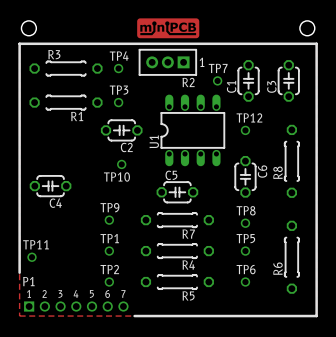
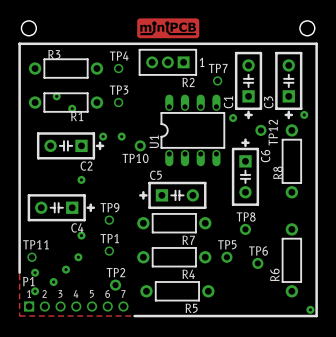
R3 footprint: [29, 60, 103, 77] -> [28, 58, 104, 79]
C1 footprint: [237, 60, 260, 102] -> [234, 51, 263, 120]
C3 footprint: [277, 60, 300, 102] -> [275, 51, 303, 120]
R1 footprint: [29, 94, 103, 111] -> [28, 92, 104, 113]
via: none -> (56, 96)
via: none -> (72, 108)
via: none -> (304, 114)
via: none -> (233, 118)
C2 footprint: [100, 119, 143, 142] -> [36, 132, 105, 160]
R8 footprint: [283, 124, 300, 198] -> [281, 124, 303, 199]
TP12 footprint: [240, 125, 251, 136] -> [255, 124, 267, 136]
via: none -> (103, 136)
via: none -> (121, 136)
C6 footprint: [234, 155, 257, 198] -> [231, 138, 260, 206]
TP10 footprint: [117, 159, 127, 170] -> [134, 140, 146, 152]
C4 footprint: [29, 174, 72, 198] -> [27, 194, 96, 222]
via: none -> (81, 179)
C5 footprint: [156, 181, 199, 204] -> [139, 181, 207, 209]
R7 footprint: [140, 212, 214, 229] -> [137, 213, 212, 234]
TP8 footprint: [240, 218, 251, 228] -> [239, 223, 252, 235]
R6 footprint: [283, 220, 300, 294] -> [281, 223, 303, 298]
via: none -> (81, 235)
R4 footprint: [140, 243, 214, 260] -> [137, 247, 212, 268]
TP5 footprint: [240, 246, 251, 256] -> [221, 251, 233, 263]
via: none -> (78, 257)
via: none -> (66, 269)
via: none -> (35, 272)
R5 footprint: [140, 273, 214, 291] -> [140, 281, 215, 302]
TP2 footprint: [104, 277, 115, 287] -> [109, 279, 122, 291]
TP6 footprint: [240, 277, 251, 287] -> [252, 257, 264, 270]
via: none -> (53, 282)
via: none -> (35, 291)
via: none -> (310, 309)

